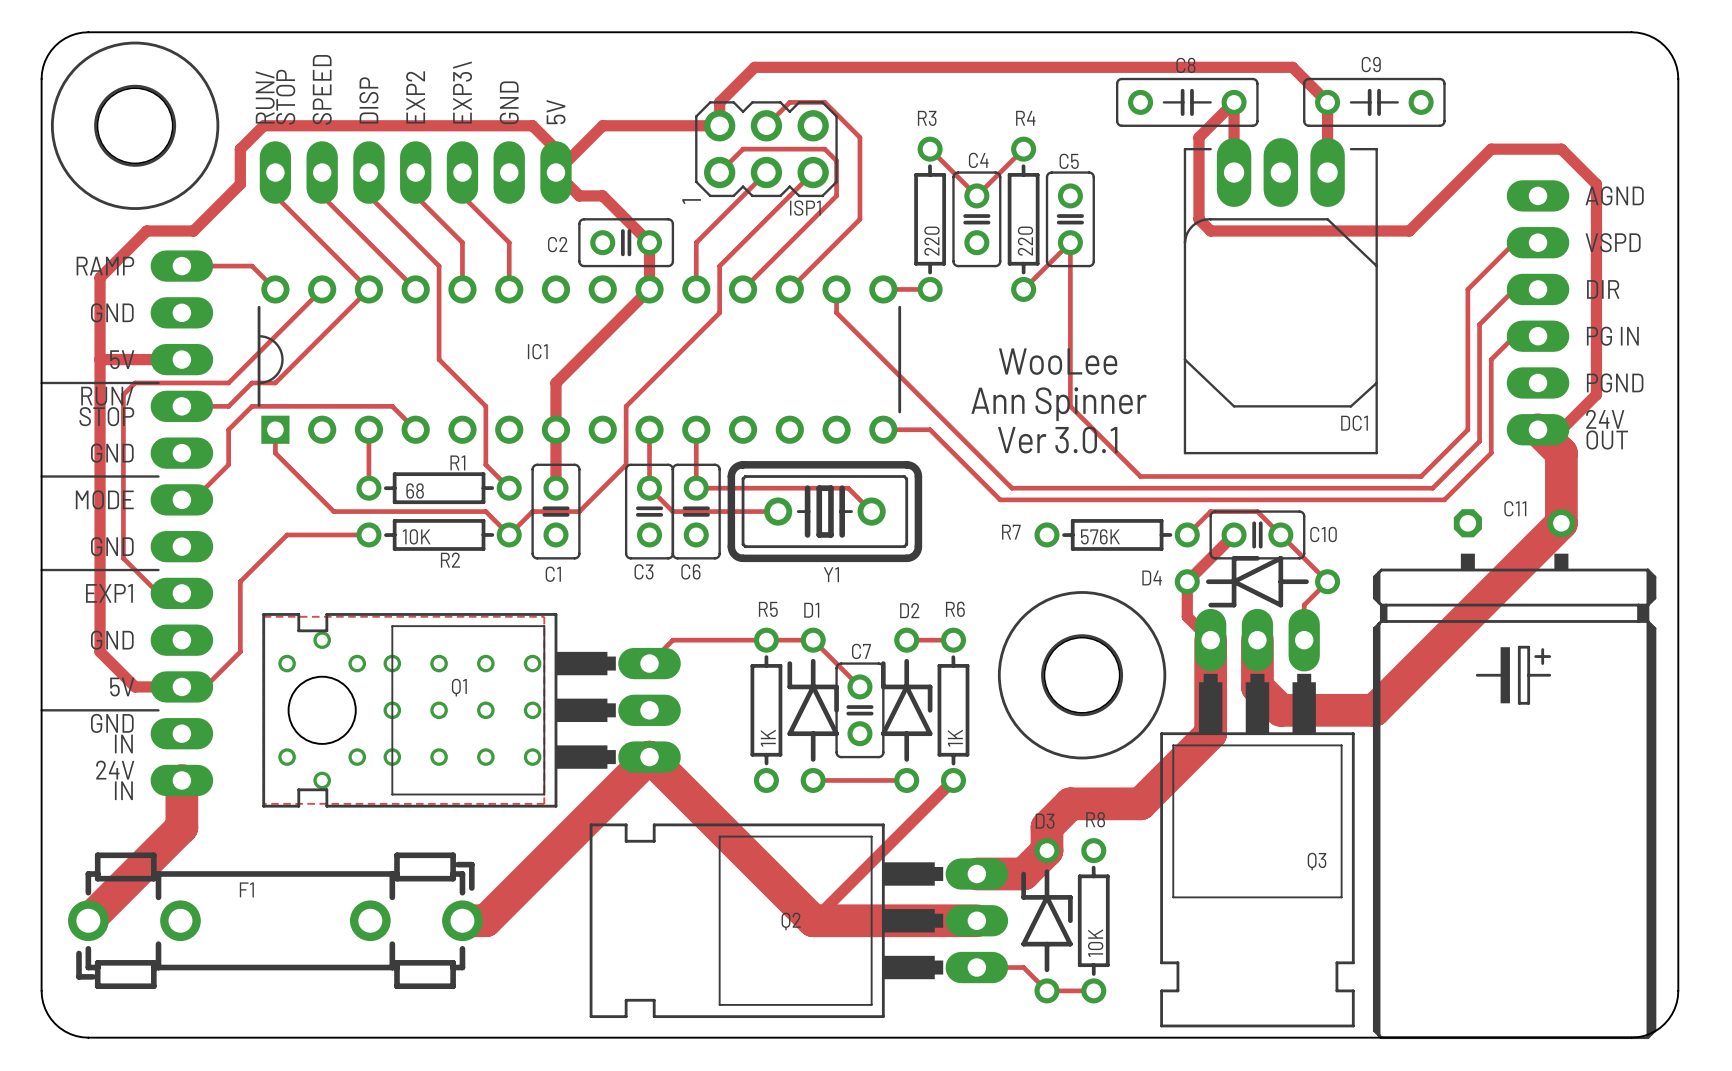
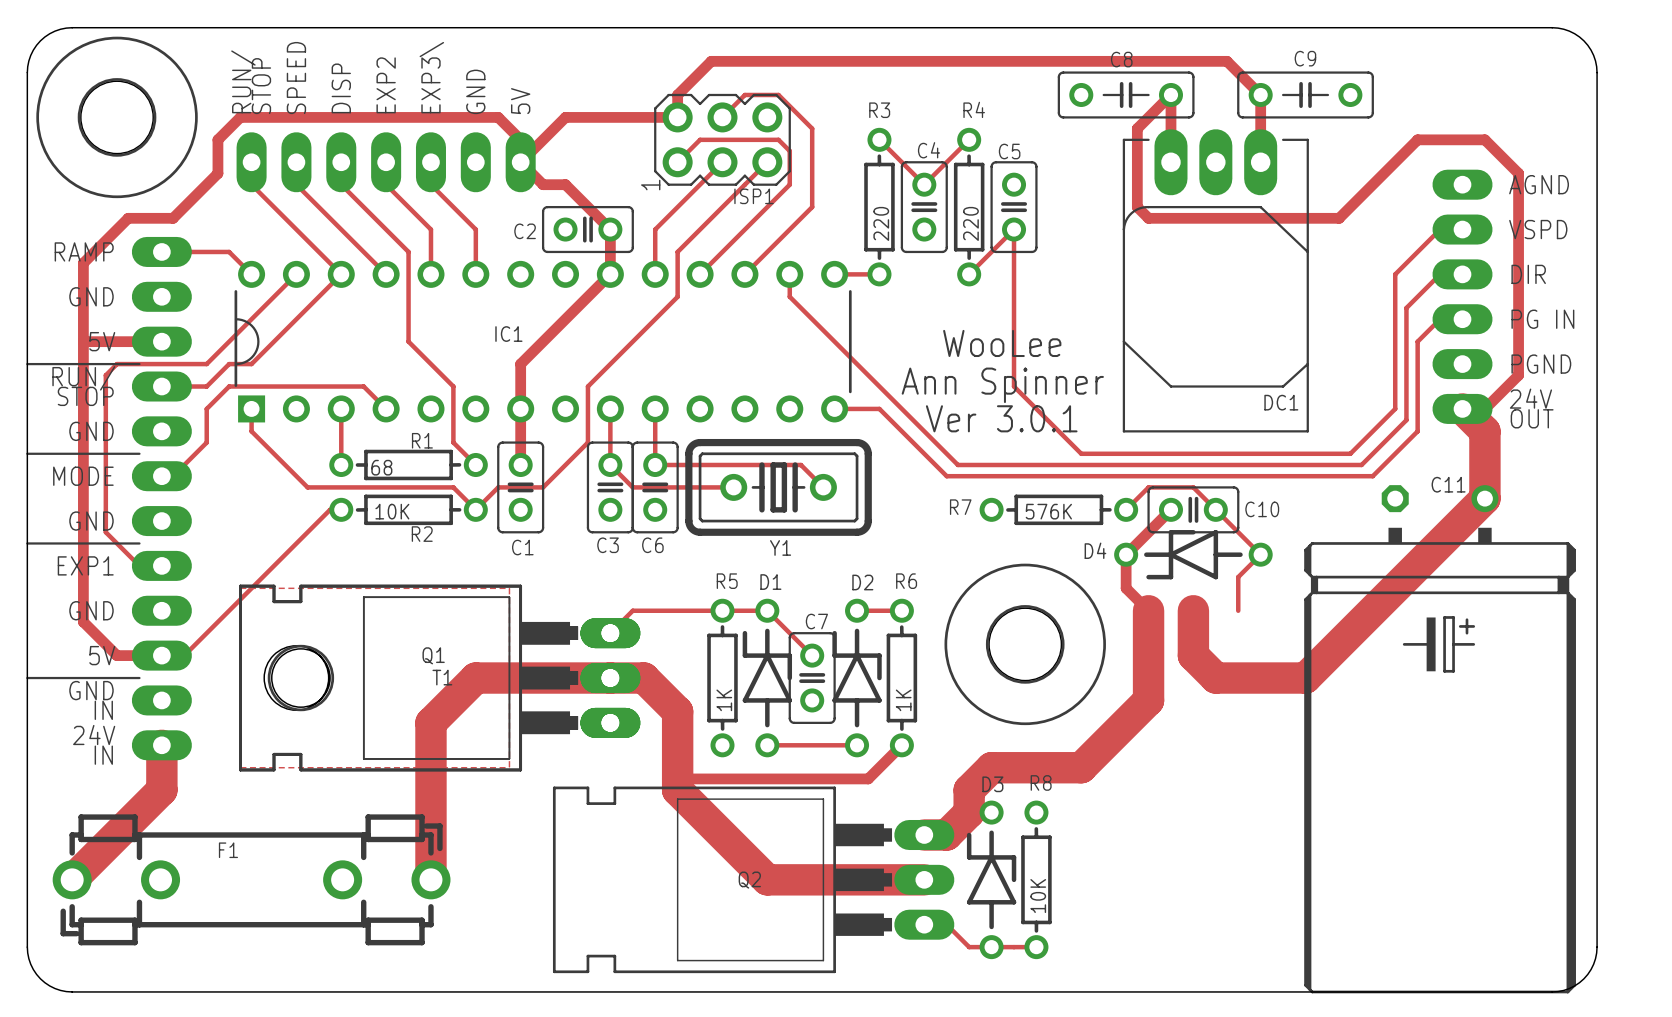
track: (357, 534) (287, 534) (240, 581) (240, 651) -> (330, 509) (217, 621)
via: (322, 640) -> none
via: (287, 663) -> none
via: (357, 663) -> none
via: (392, 663) -> none
via: (439, 663) -> none
via: (485, 663) -> none
via: (532, 663) -> none
via: (392, 710) -> none
via: (439, 710) -> none
T1: none -> (439, 678)
via: (485, 710) -> none
via: (532, 710) -> none
via: (287, 757) -> none
via: (357, 757) -> none
via: (392, 757) -> none
via: (439, 757) -> none
via: (485, 757) -> none
via: (532, 757) -> none
via: (322, 780) -> none
track: (1070, 803) (1047, 827) (1047, 850) (1023, 873) (1000, 873) -> (1014, 767) (991, 767) (969, 790) (969, 812) (946, 835)
track: (918, 815) (813, 920) -> (868, 778) (677, 778)
Q3: (1257, 818) -> none
track: (719, 827) (649, 757) (485, 920) (462, 920) -> (677, 790) (677, 711) (644, 678) (475, 678) (430, 722) (430, 879)
track: (1000, 967) (1023, 967) (1047, 990) -> (946, 924) (969, 947) (991, 947)

